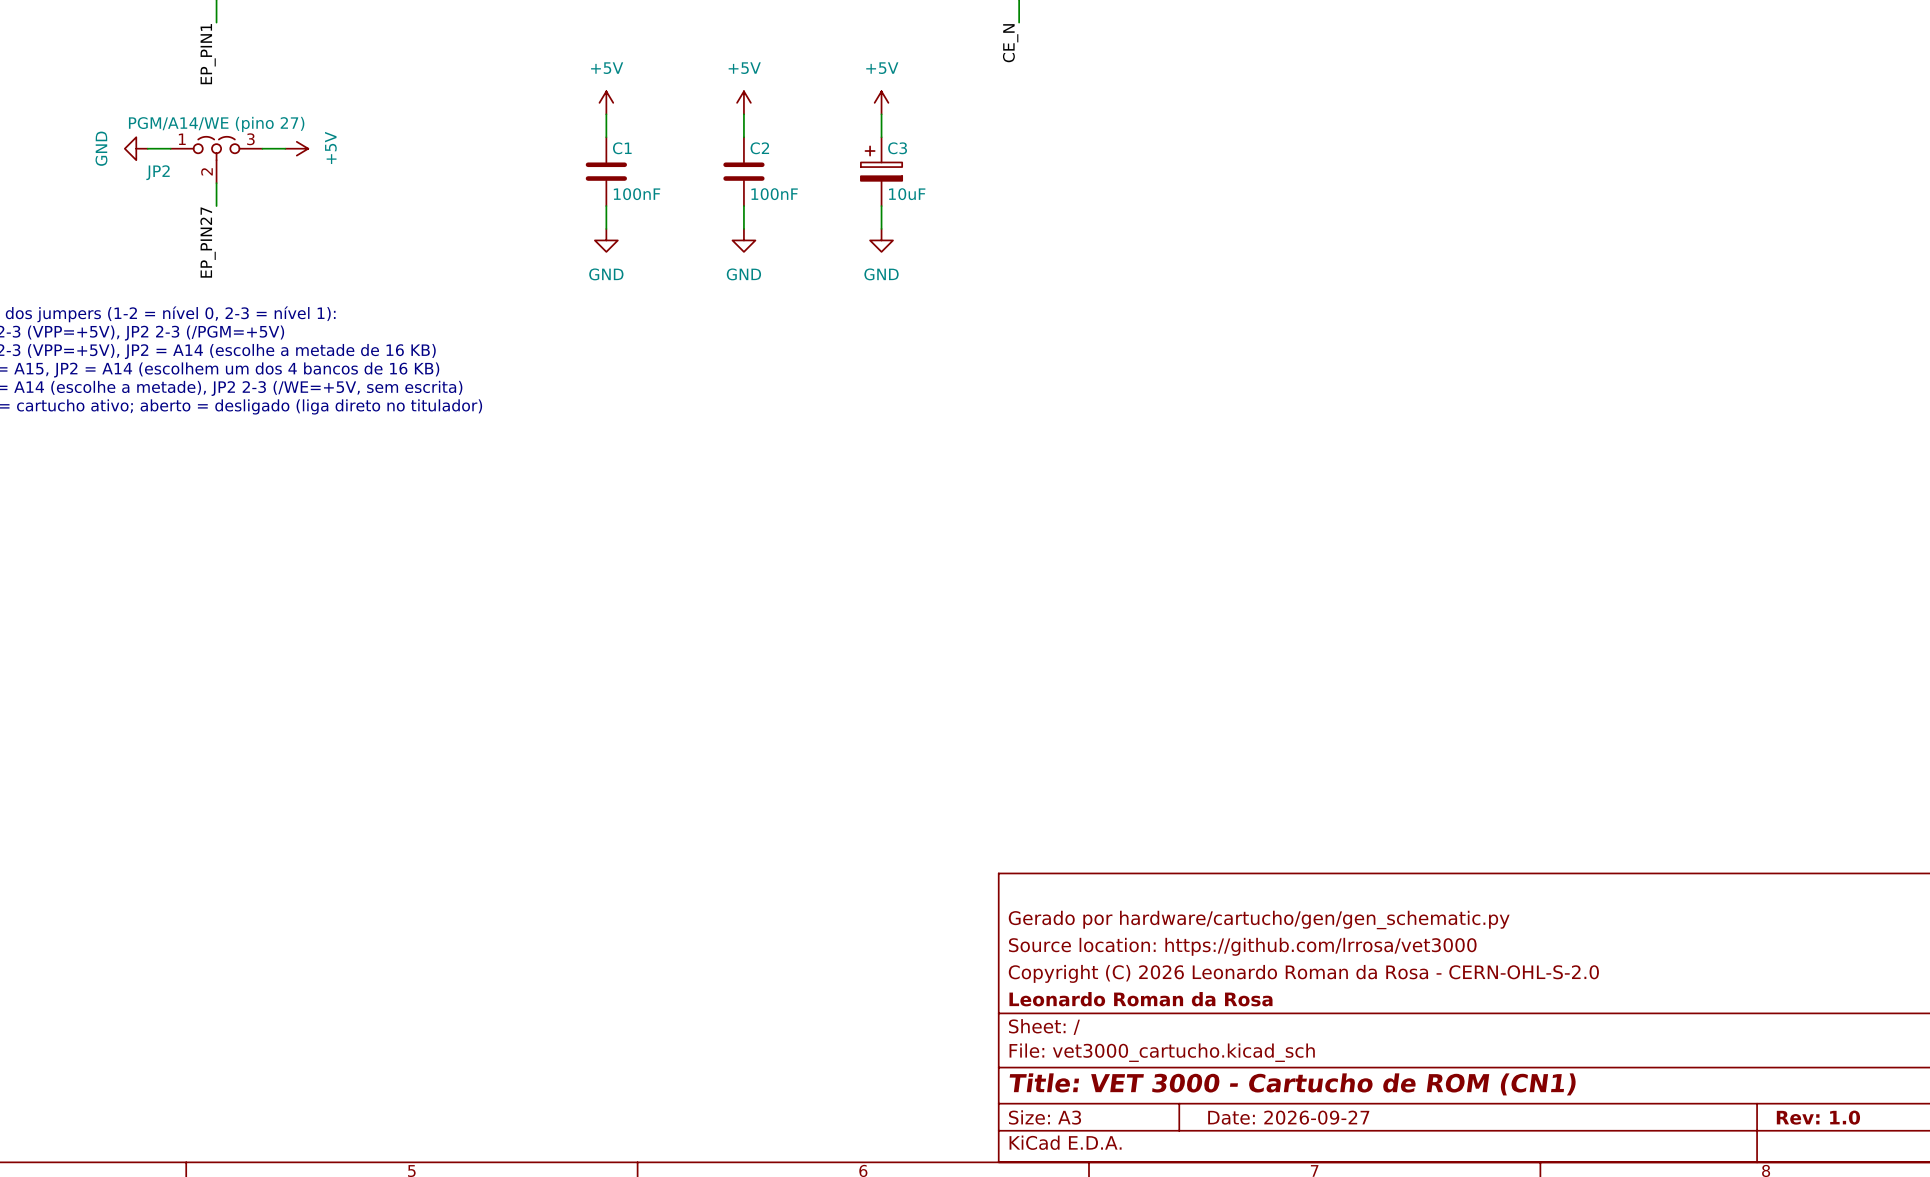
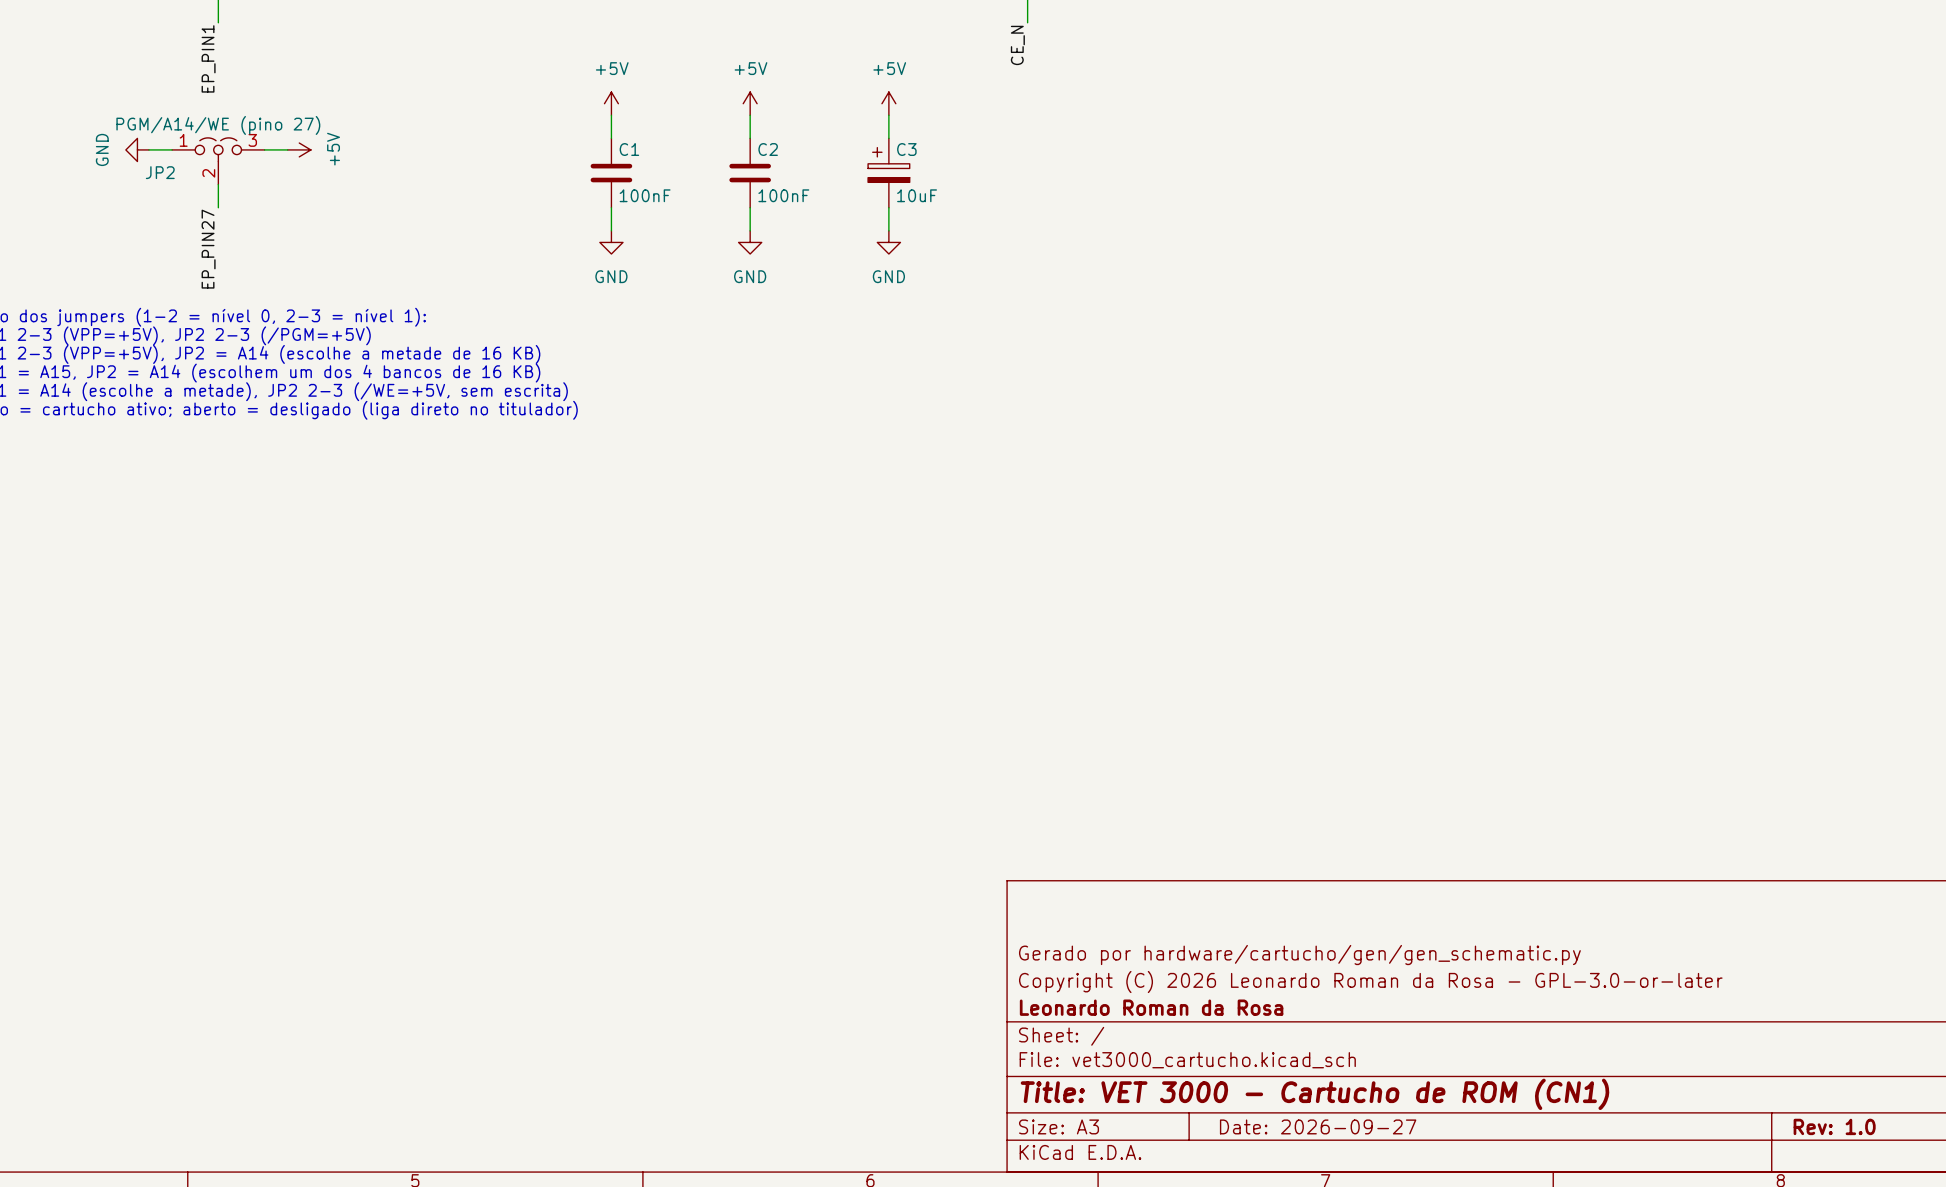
title block: Gerado por hardware/cartucho/gen/gen_schematic.py (1259, 920) -> none
title block: Source location: https://github.com/lrrosa/vet3000 (1242, 946) -> Gerado por hardware/cartucho/gen/gen_schematic.py (1299, 955)
title block: Copyright (C) 2026 Leonardo Roman da Rosa - CERN-OHL-S-2.0 (1303, 973) -> Copyright (C) 2026 Leonardo Roman da Rosa - GPL-3.0-or-later (1370, 982)

